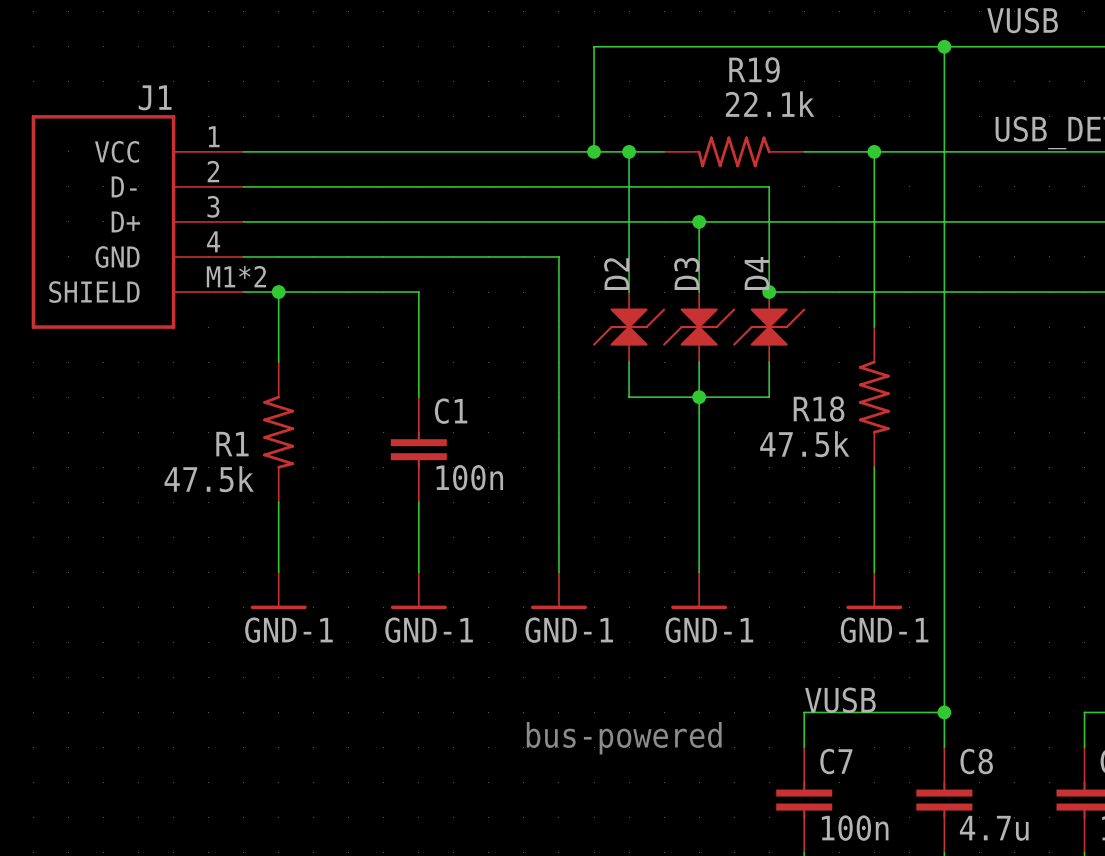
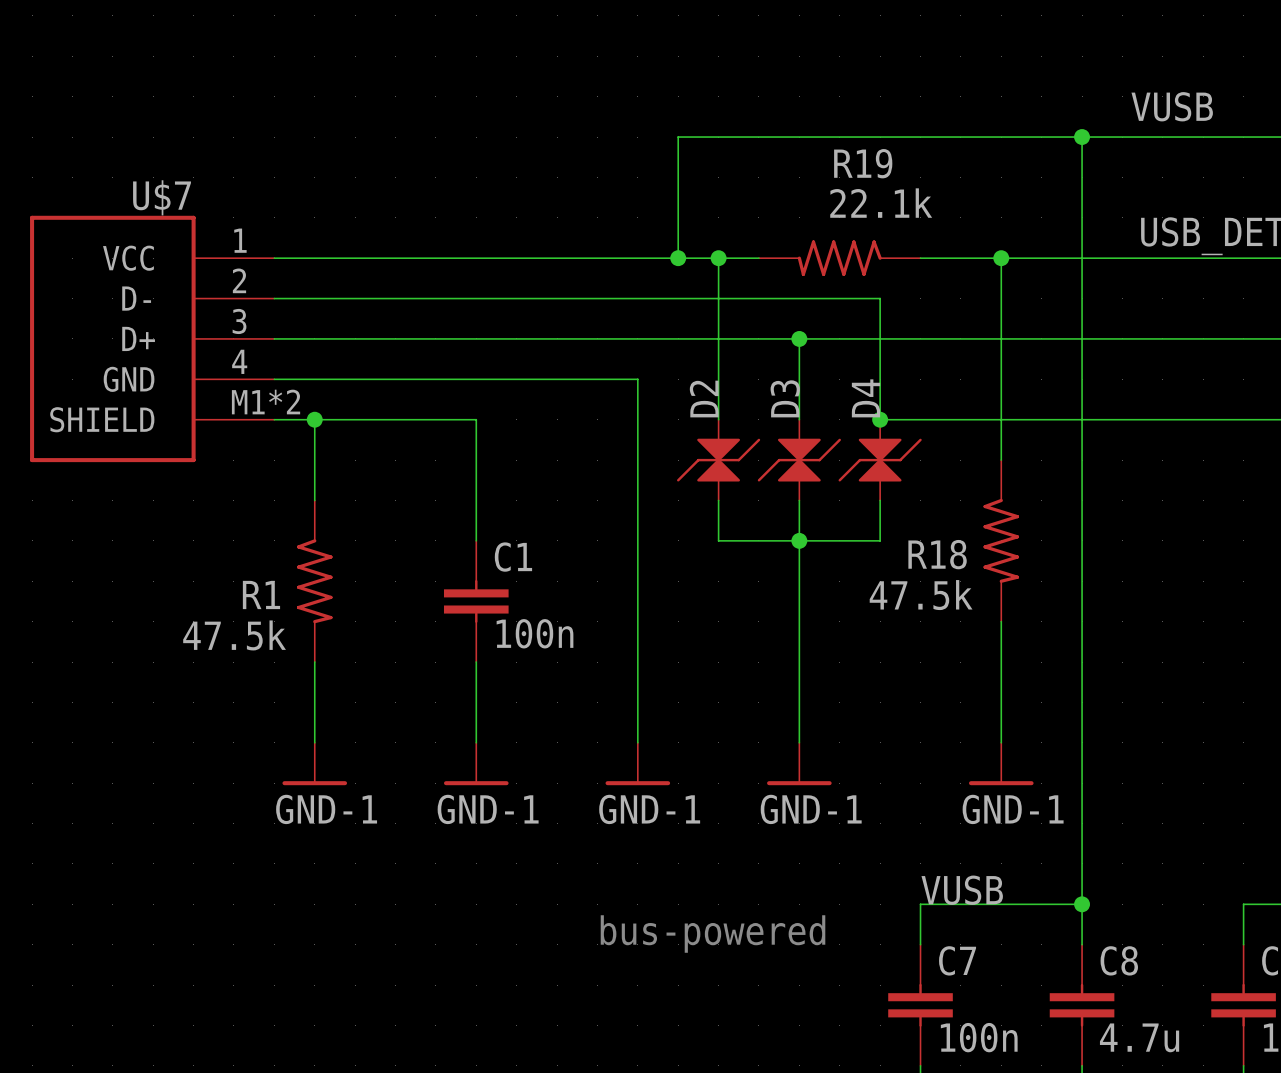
J1 name: J1 (155, 97) -> U$7 (162, 197)

